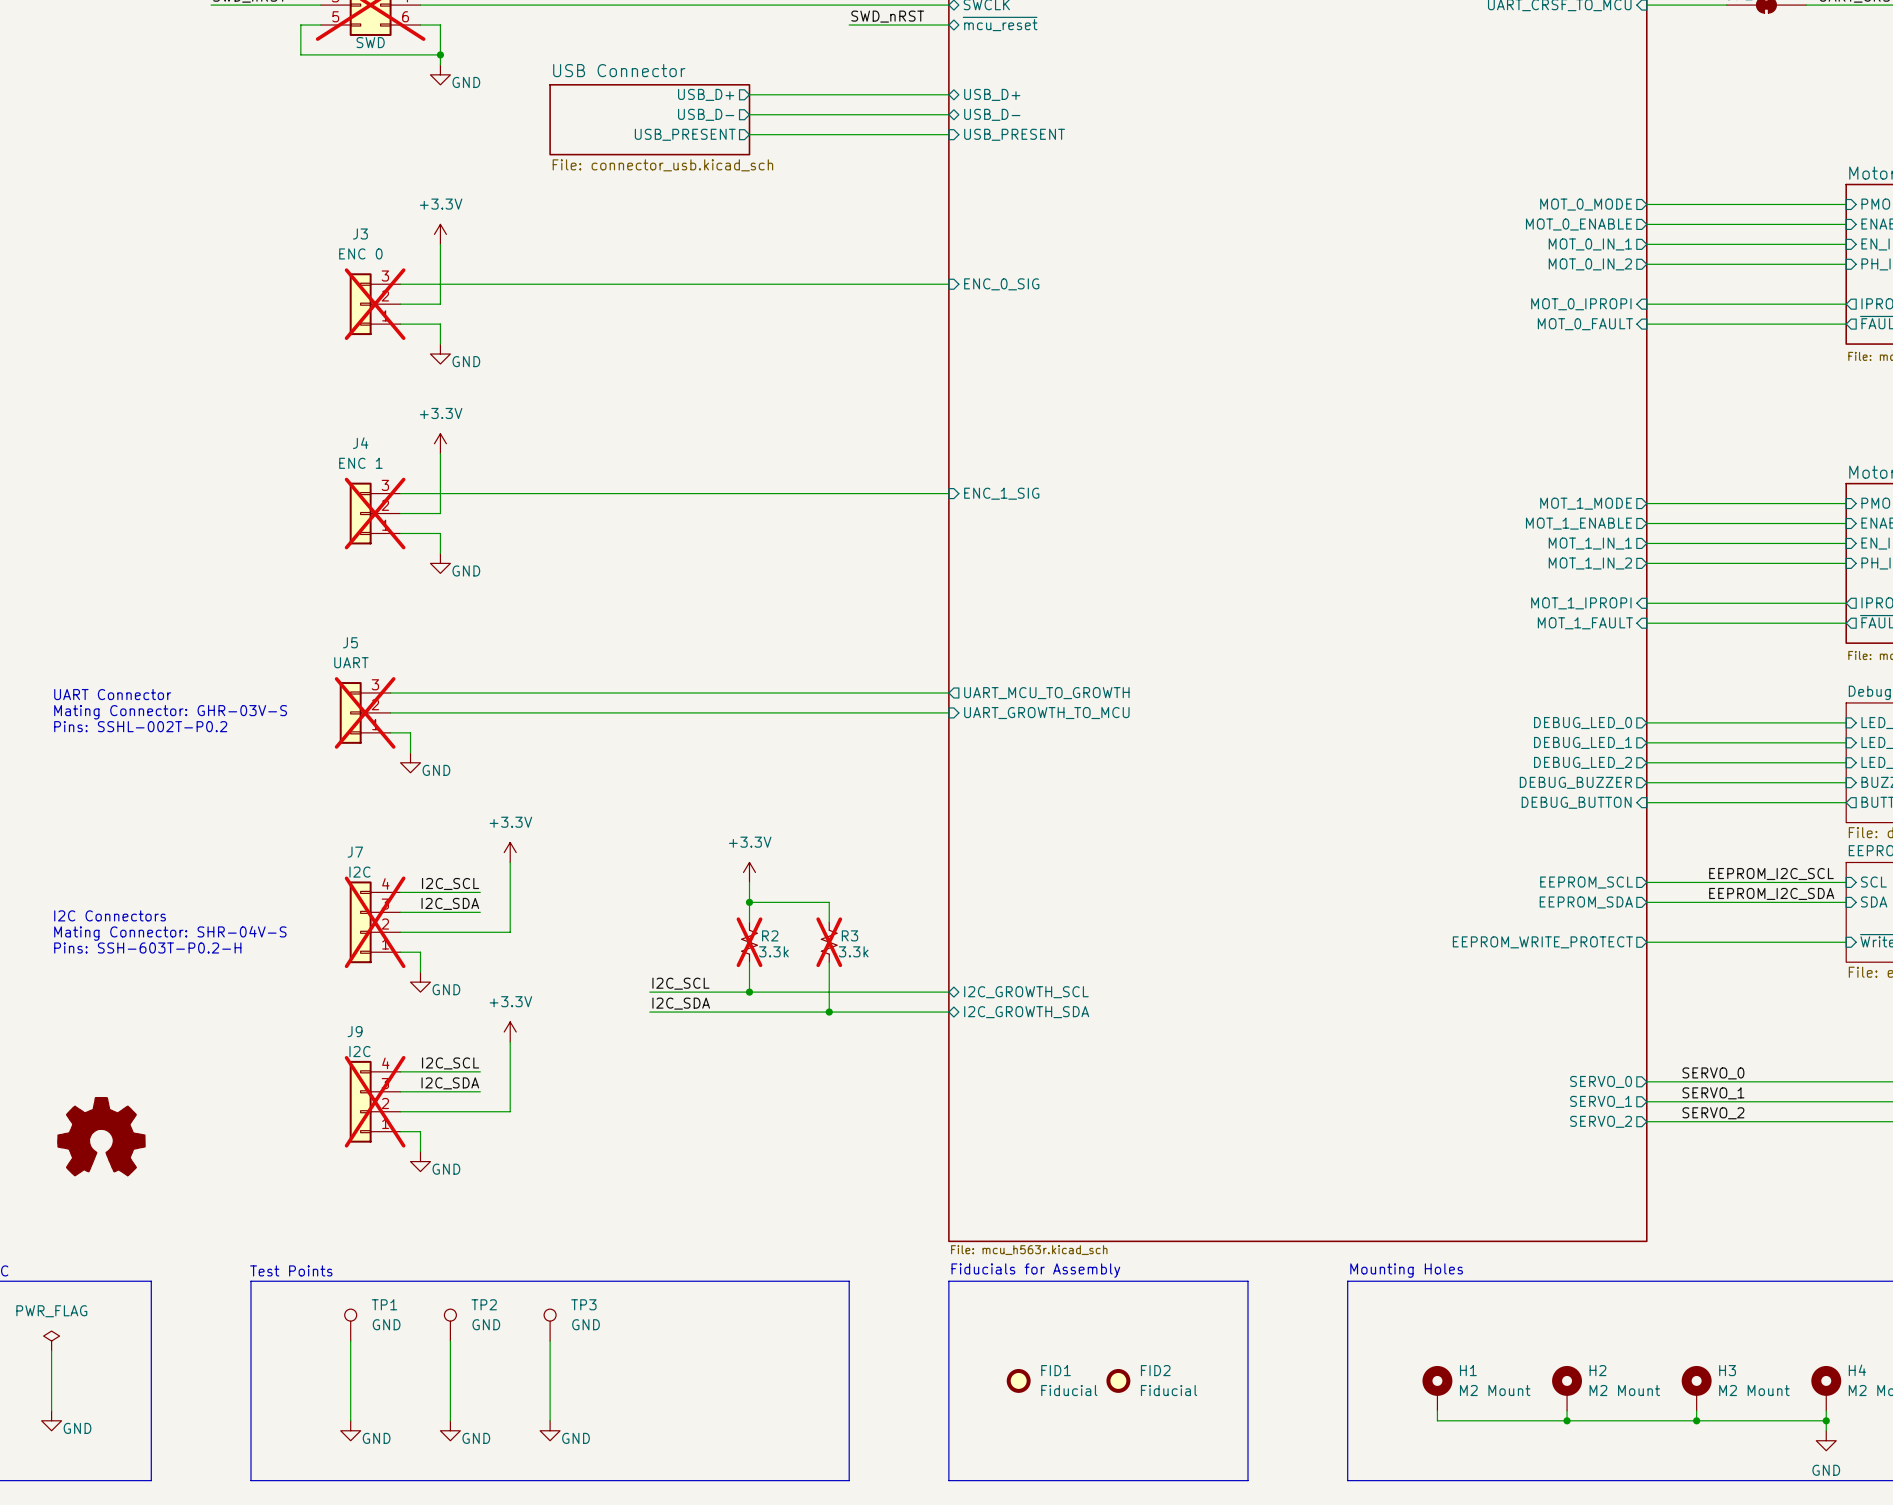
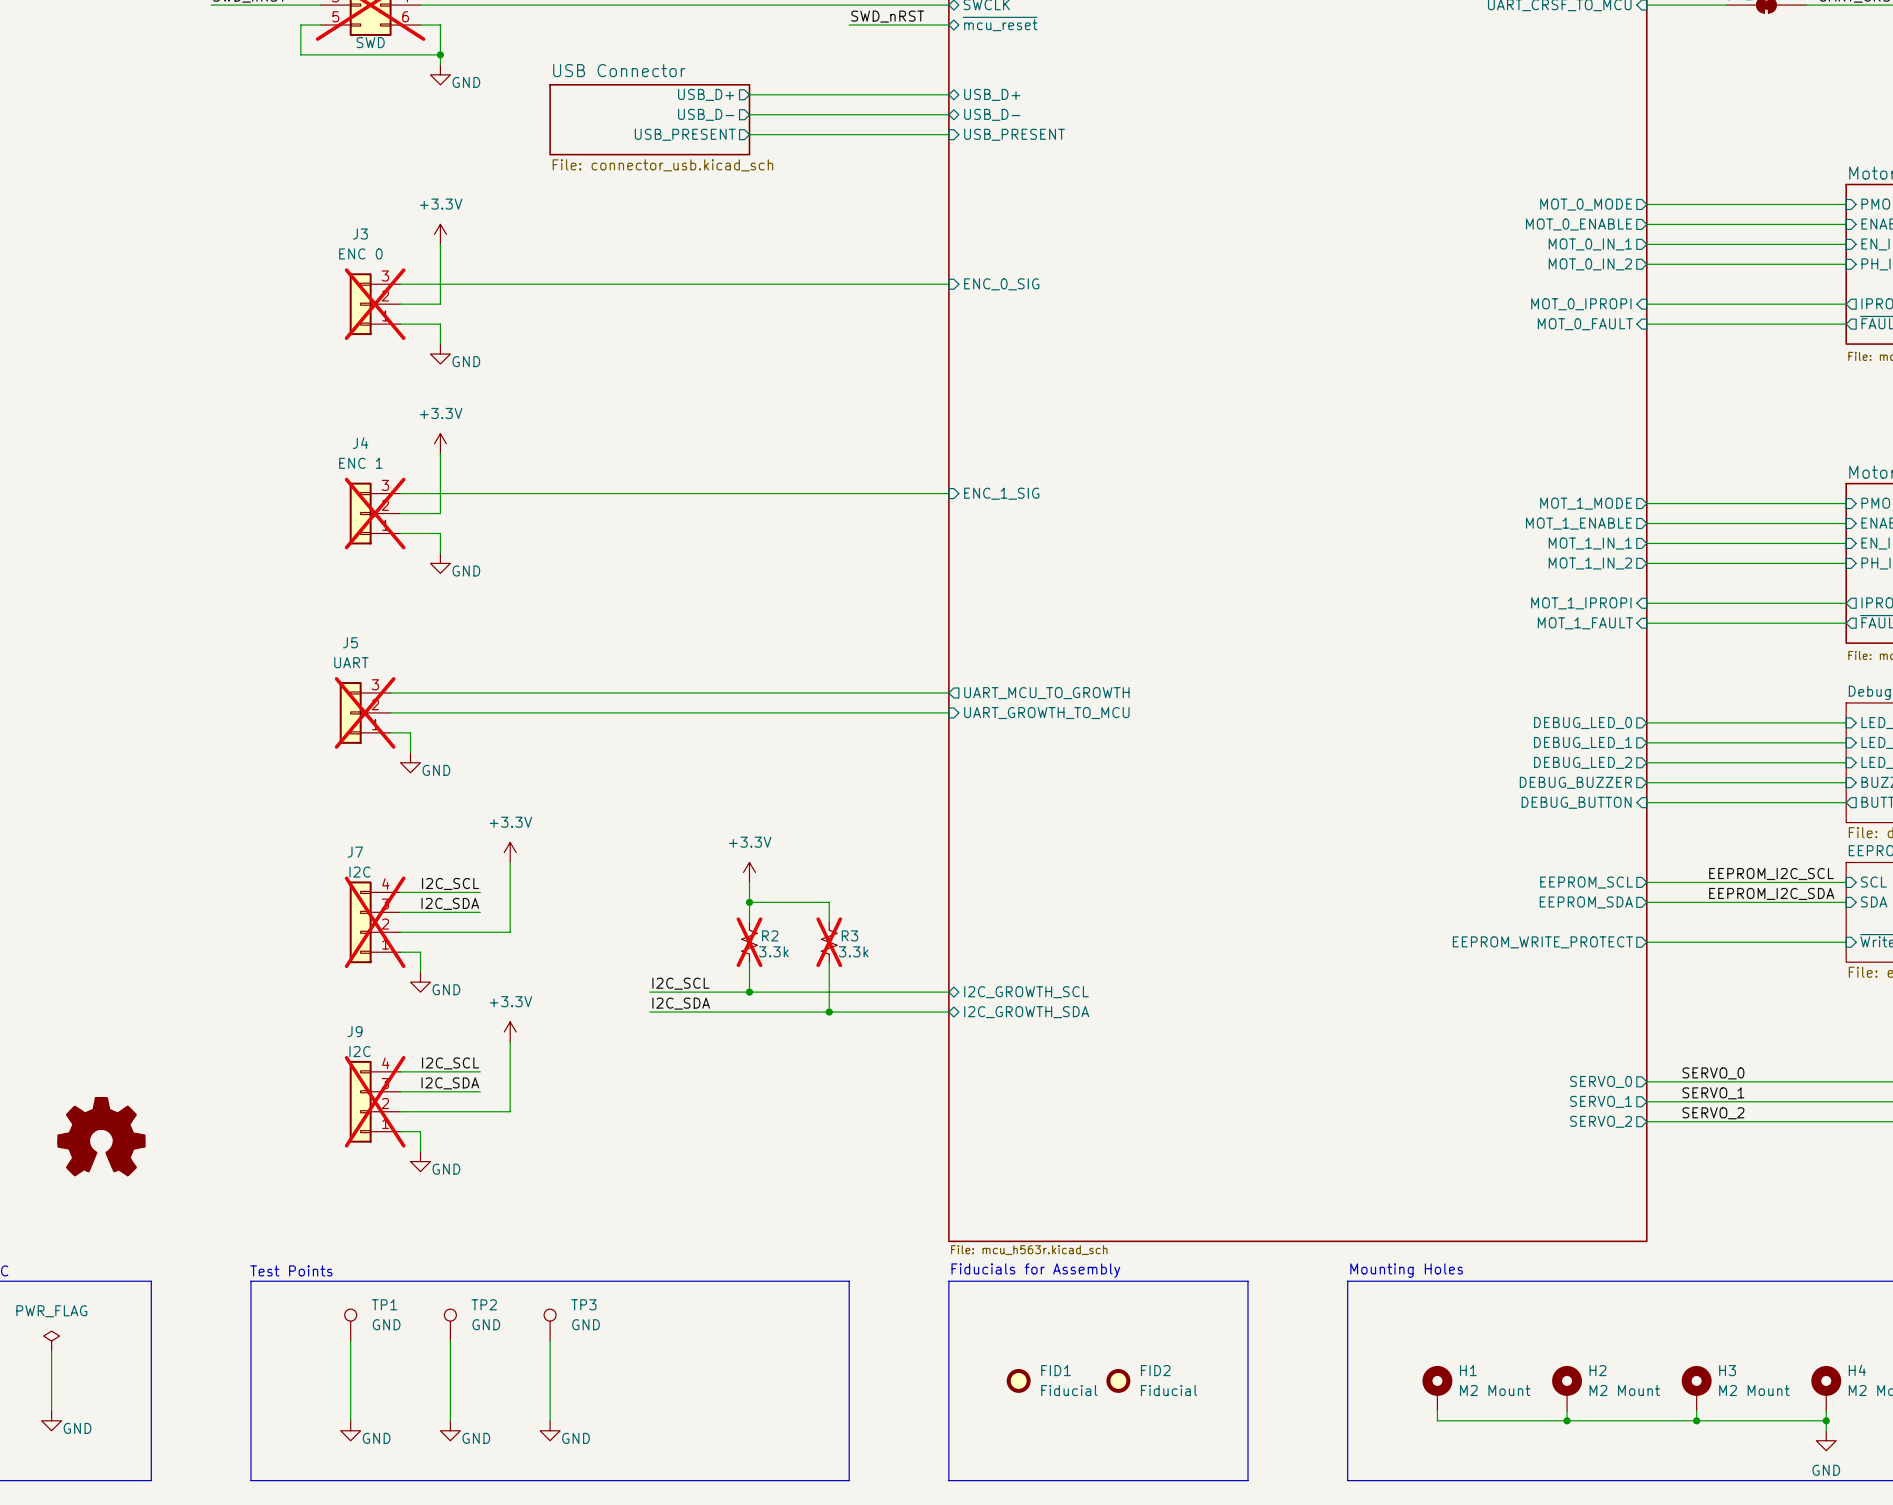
text: UART Connector (112, 694) -> none
text: Mating Connector: GHR-03V-S (170, 712) -> none
text: Pins: SSHL-002T-P0.2 (140, 726) -> none
text: I2C Connectors (110, 915) -> none
text: Mating Connector: SHR-04V-S (170, 933) -> none
text: Pins: SSH-603T-P0.2-H (147, 947) -> none

